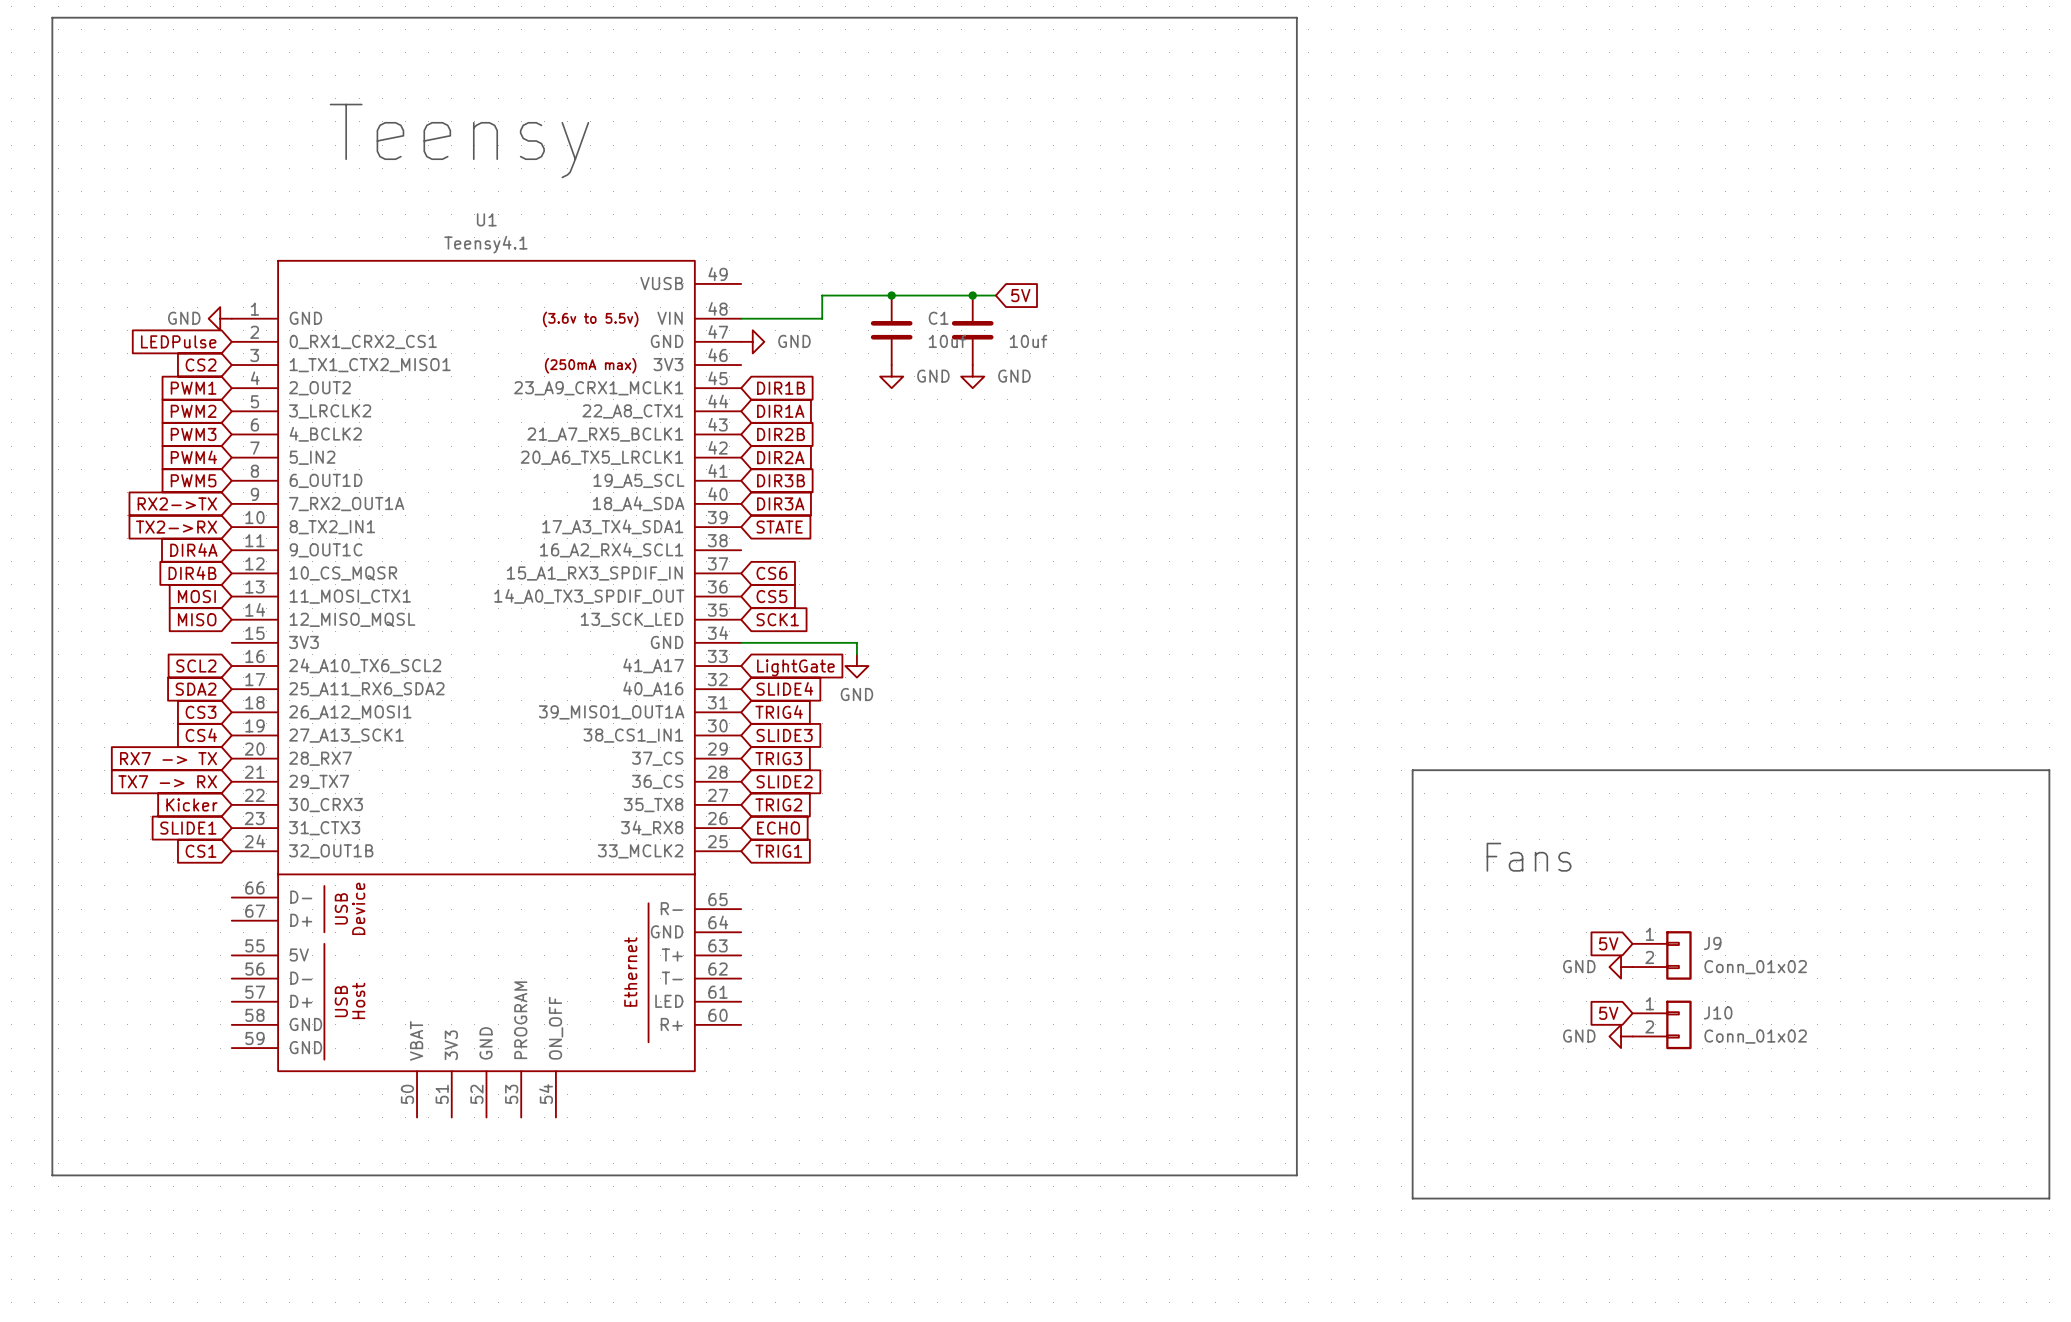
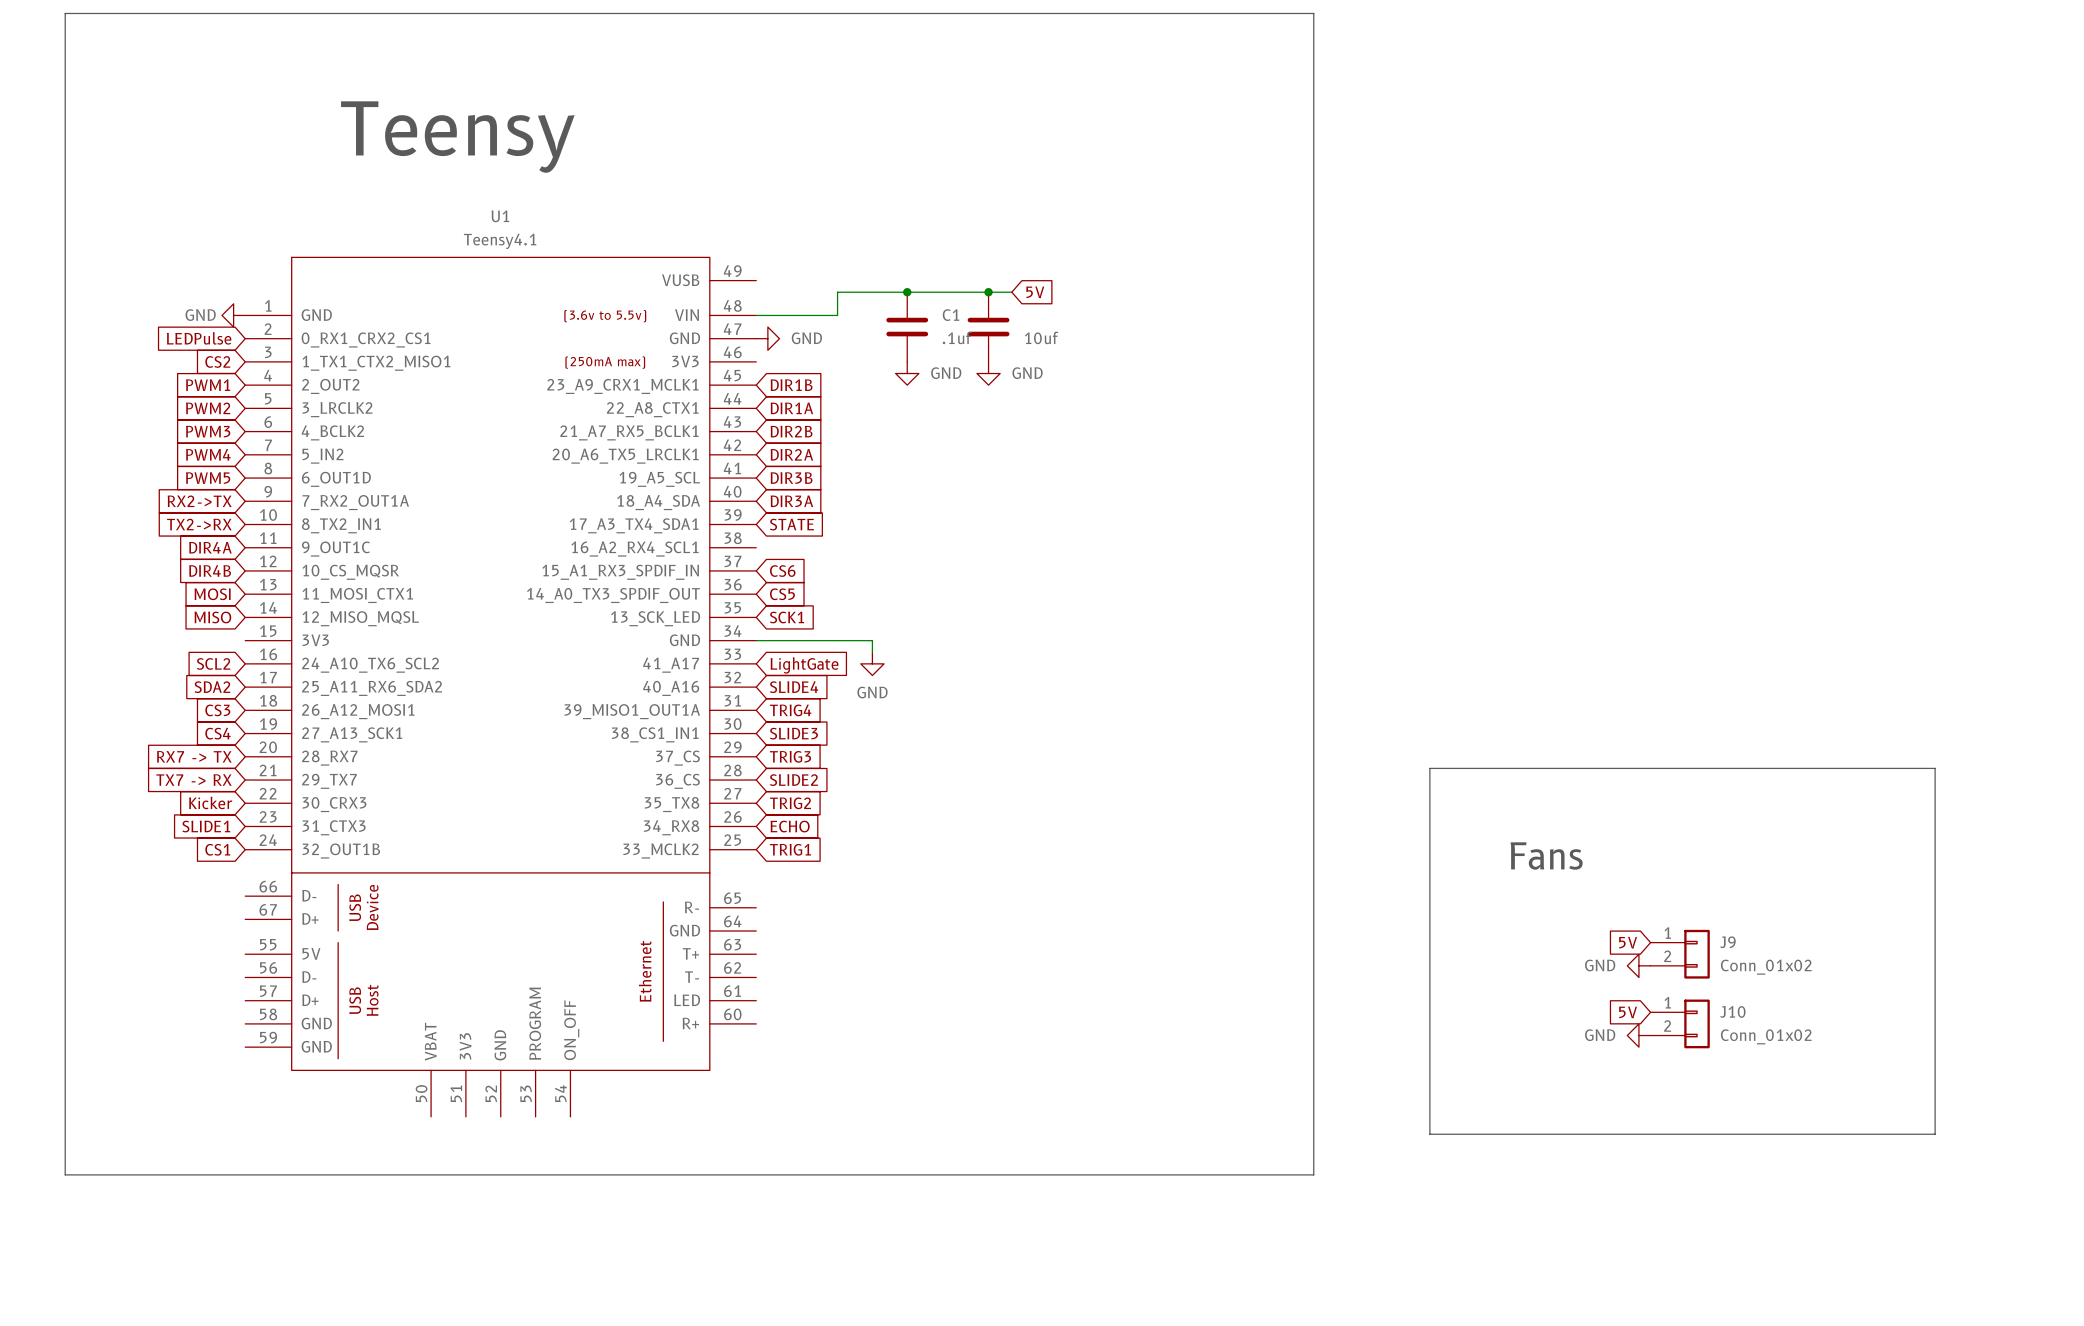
C1 value: 10uf (947, 341) -> .1uf (957, 337)
line: (1916, 770) (2049, 770) (2049, 1198) (1412, 1198) (1412, 1134) -> (1935, 768) (1935, 1134) (1429, 1134)

